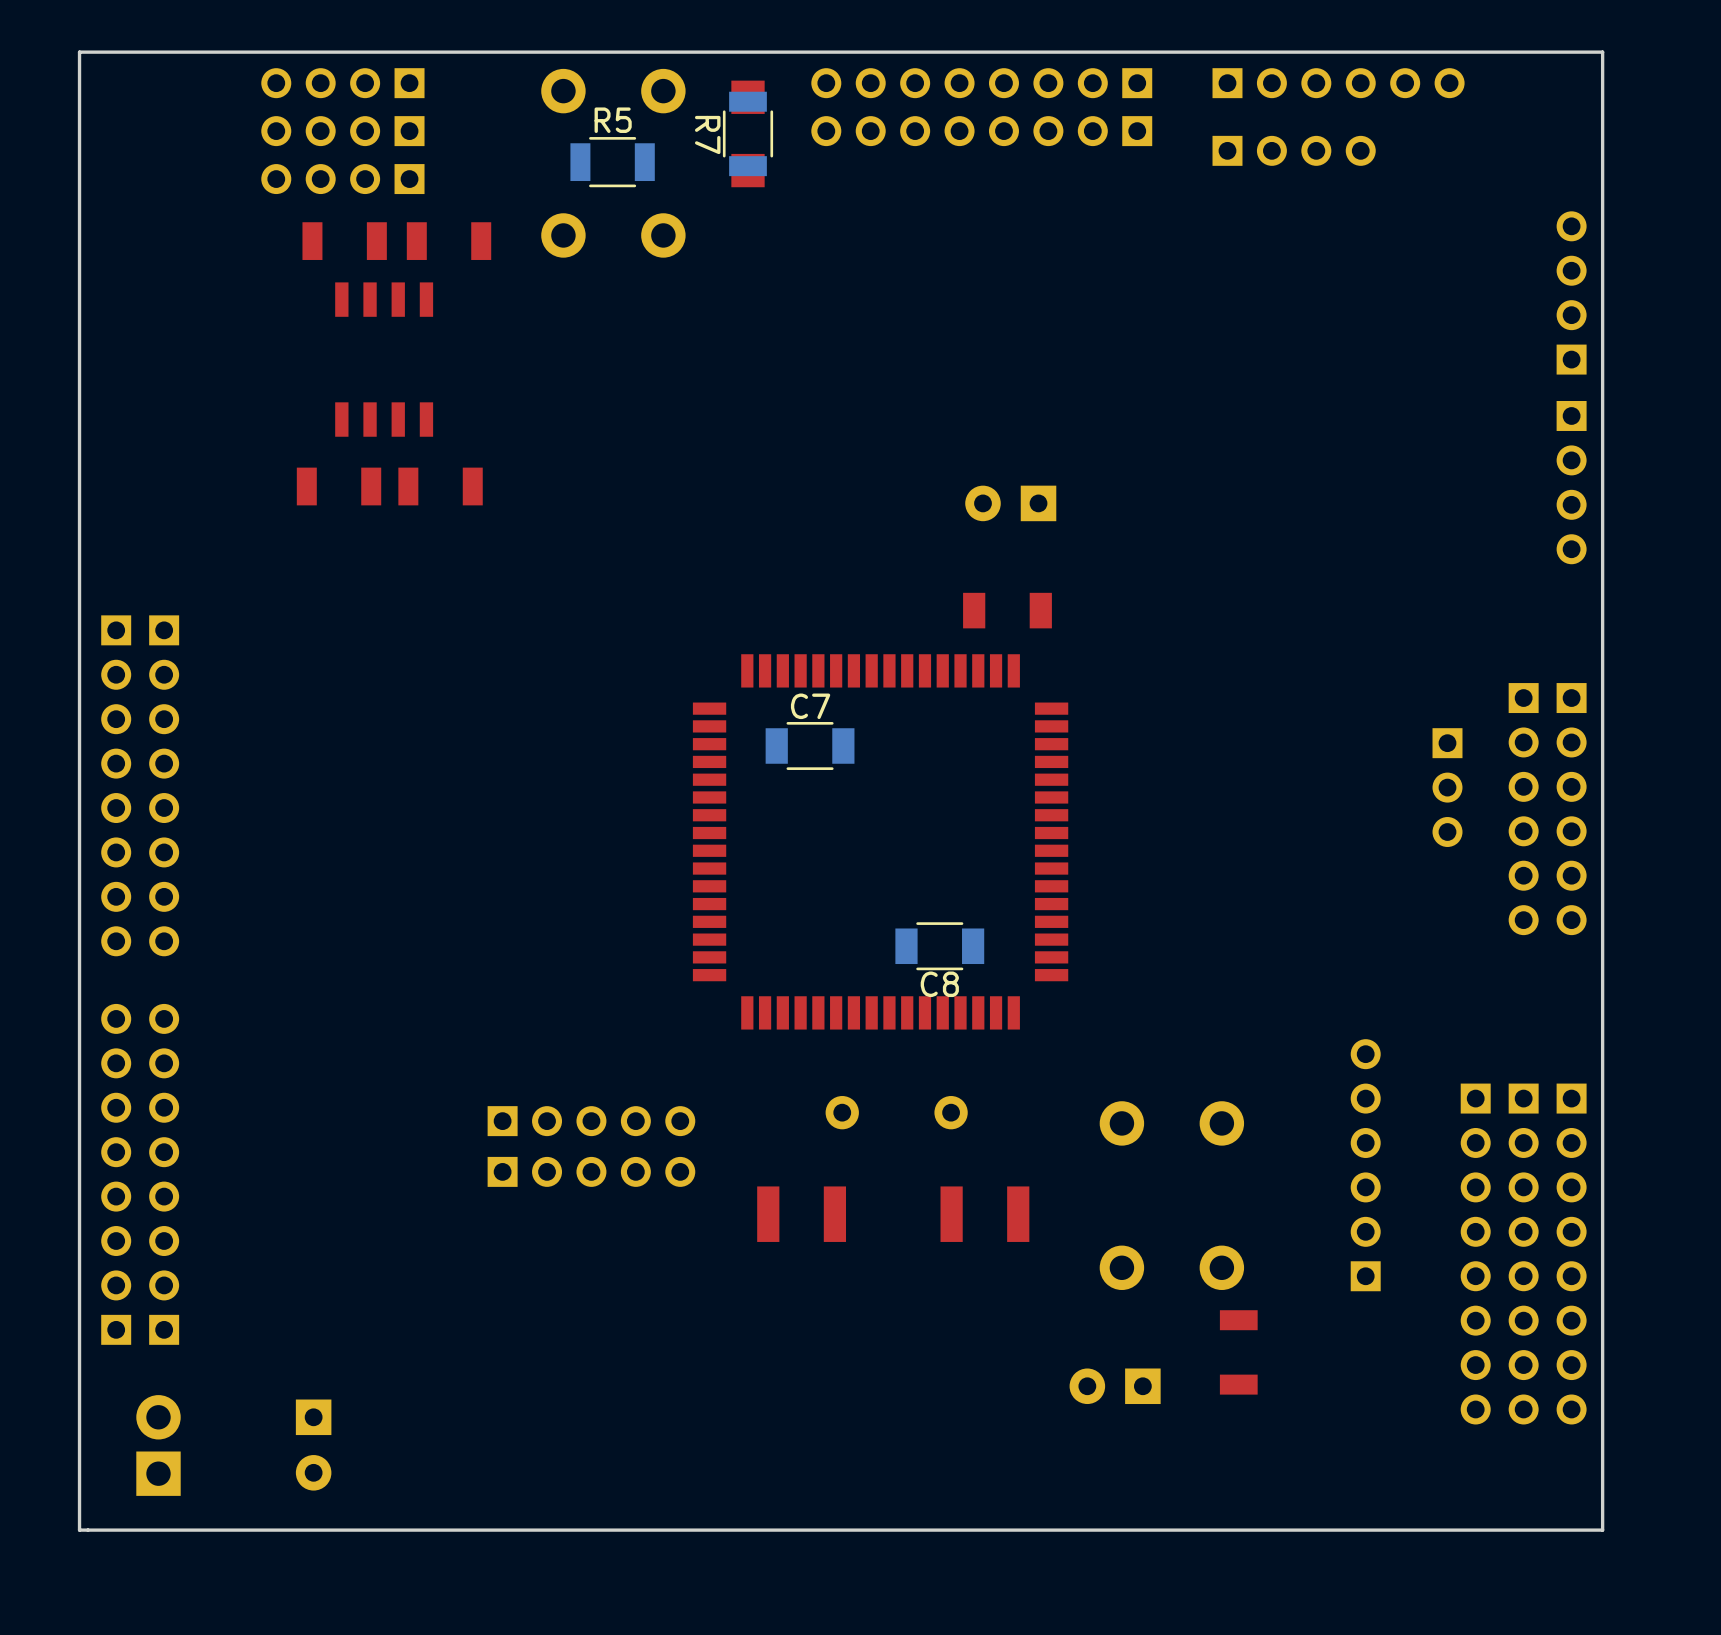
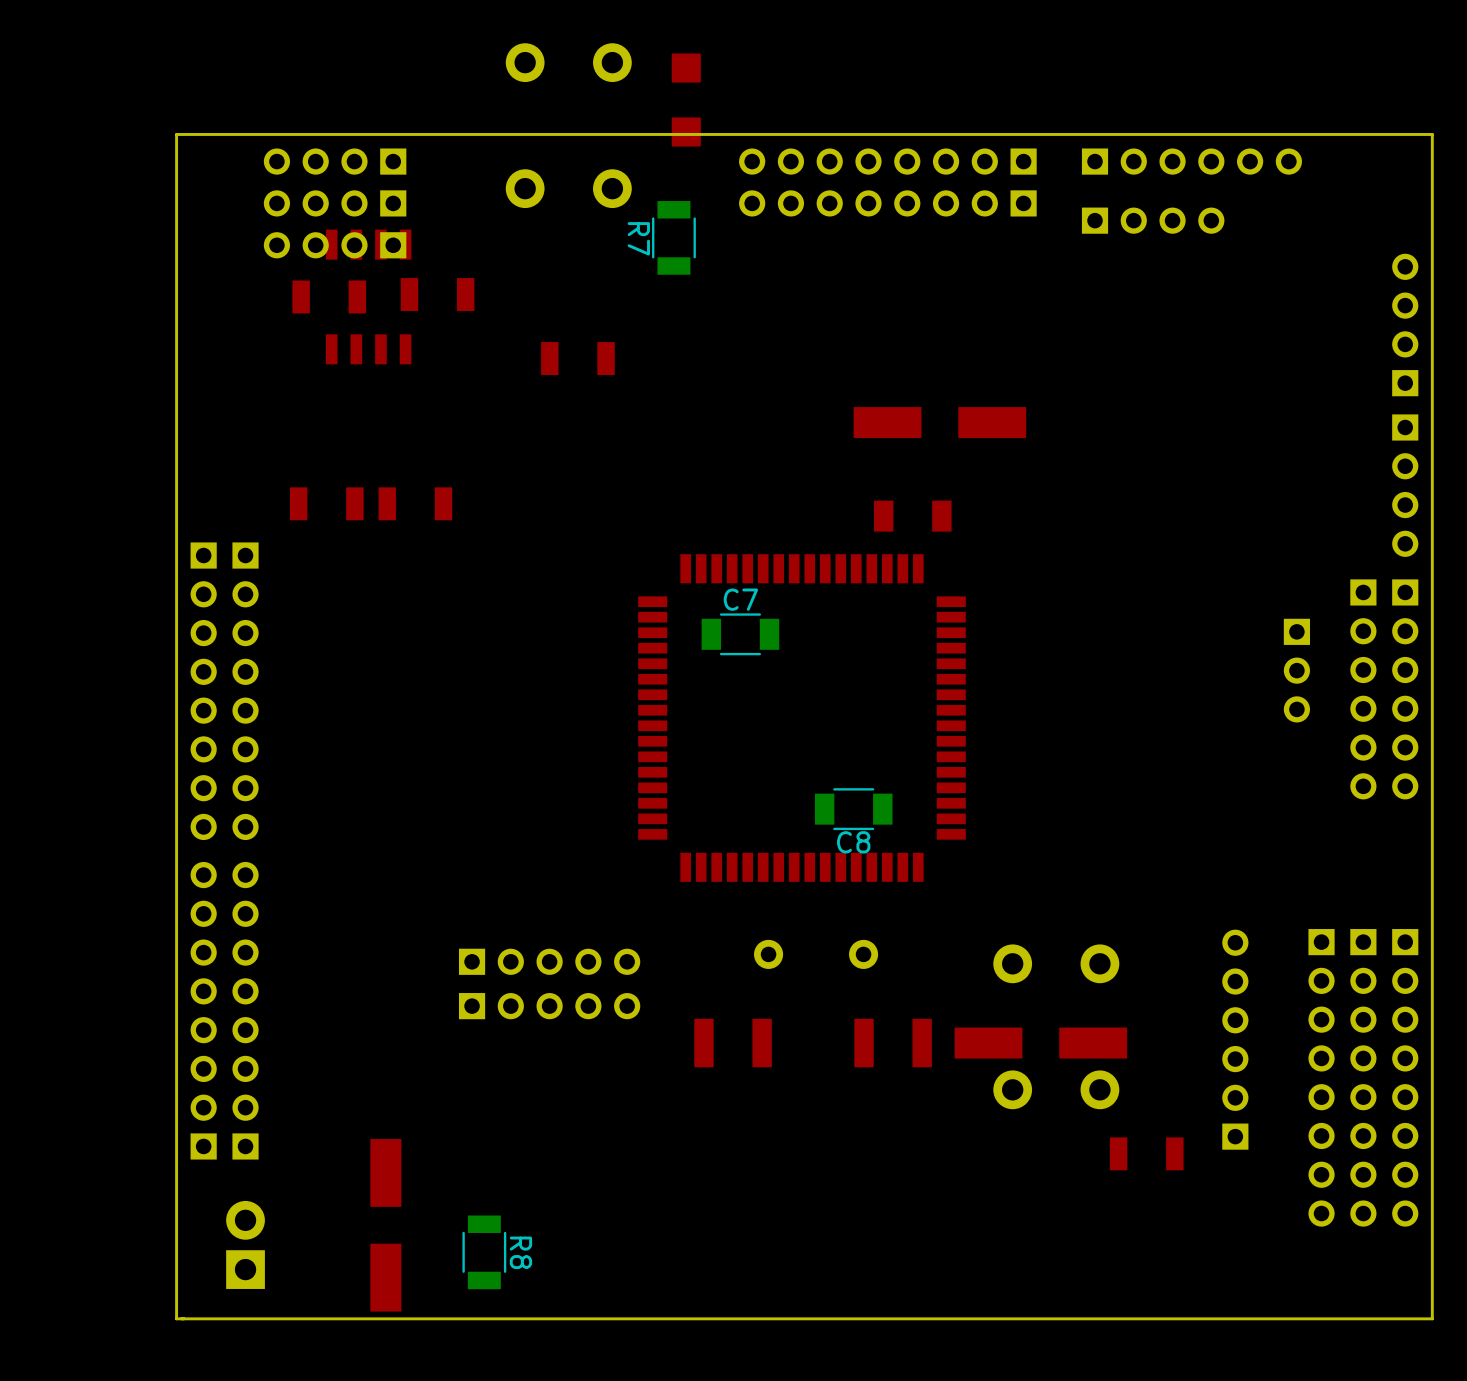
part: (342, 83) -> none
part: (981, 83) -> none
part position: (1338, 83) -> (1191, 161)
part: (342, 131) -> none
part: (981, 131) -> none
R7 position: (748, 133) -> (673, 237)
part position: (1294, 150) -> (1153, 220)
R5 side: bottom (612, 162) -> top (577, 358)
board edge: (1602, 173) (1602, 52) (79, 52) (79, 1530) (164, 1530) -> (1432, 134) (176, 134) (176, 1318)
part position: (342, 179) -> (335, 161)
part: none -> (887, 161)
part footprint: [302, 222, 387, 260] -> [263, 190, 407, 217]
part: (449, 241) -> none
part: none -> (887, 203)
part: (1571, 292) -> none
part: none -> (335, 245)
part: none -> (437, 294)
part: none -> (329, 296)
part: none -> (1405, 325)
part: (1571, 482) -> none
part: (339, 486) -> none
part: (440, 486) -> none
part: (1010, 503) -> none
part: none -> (939, 422)
part: none -> (1405, 485)
part: none -> (326, 503)
part: none -> (415, 503)
part: (116, 785) -> none
part position: (164, 785) -> (203, 691)
part: none -> (245, 691)
part position: (1365, 1165) -> (1235, 1039)
part: (116, 1174) -> none
part position: (164, 1174) -> (203, 1010)
part: none -> (245, 1010)
part: none -> (1040, 1043)
part rotation: 0° (1238, 1352) -> 90° clockwise (1146, 1153)
part: (1115, 1386) -> none
part: none -> (385, 1225)
part position: (158, 1445) -> (245, 1244)
part: (313, 1445) -> none
R8: none -> (484, 1252)

